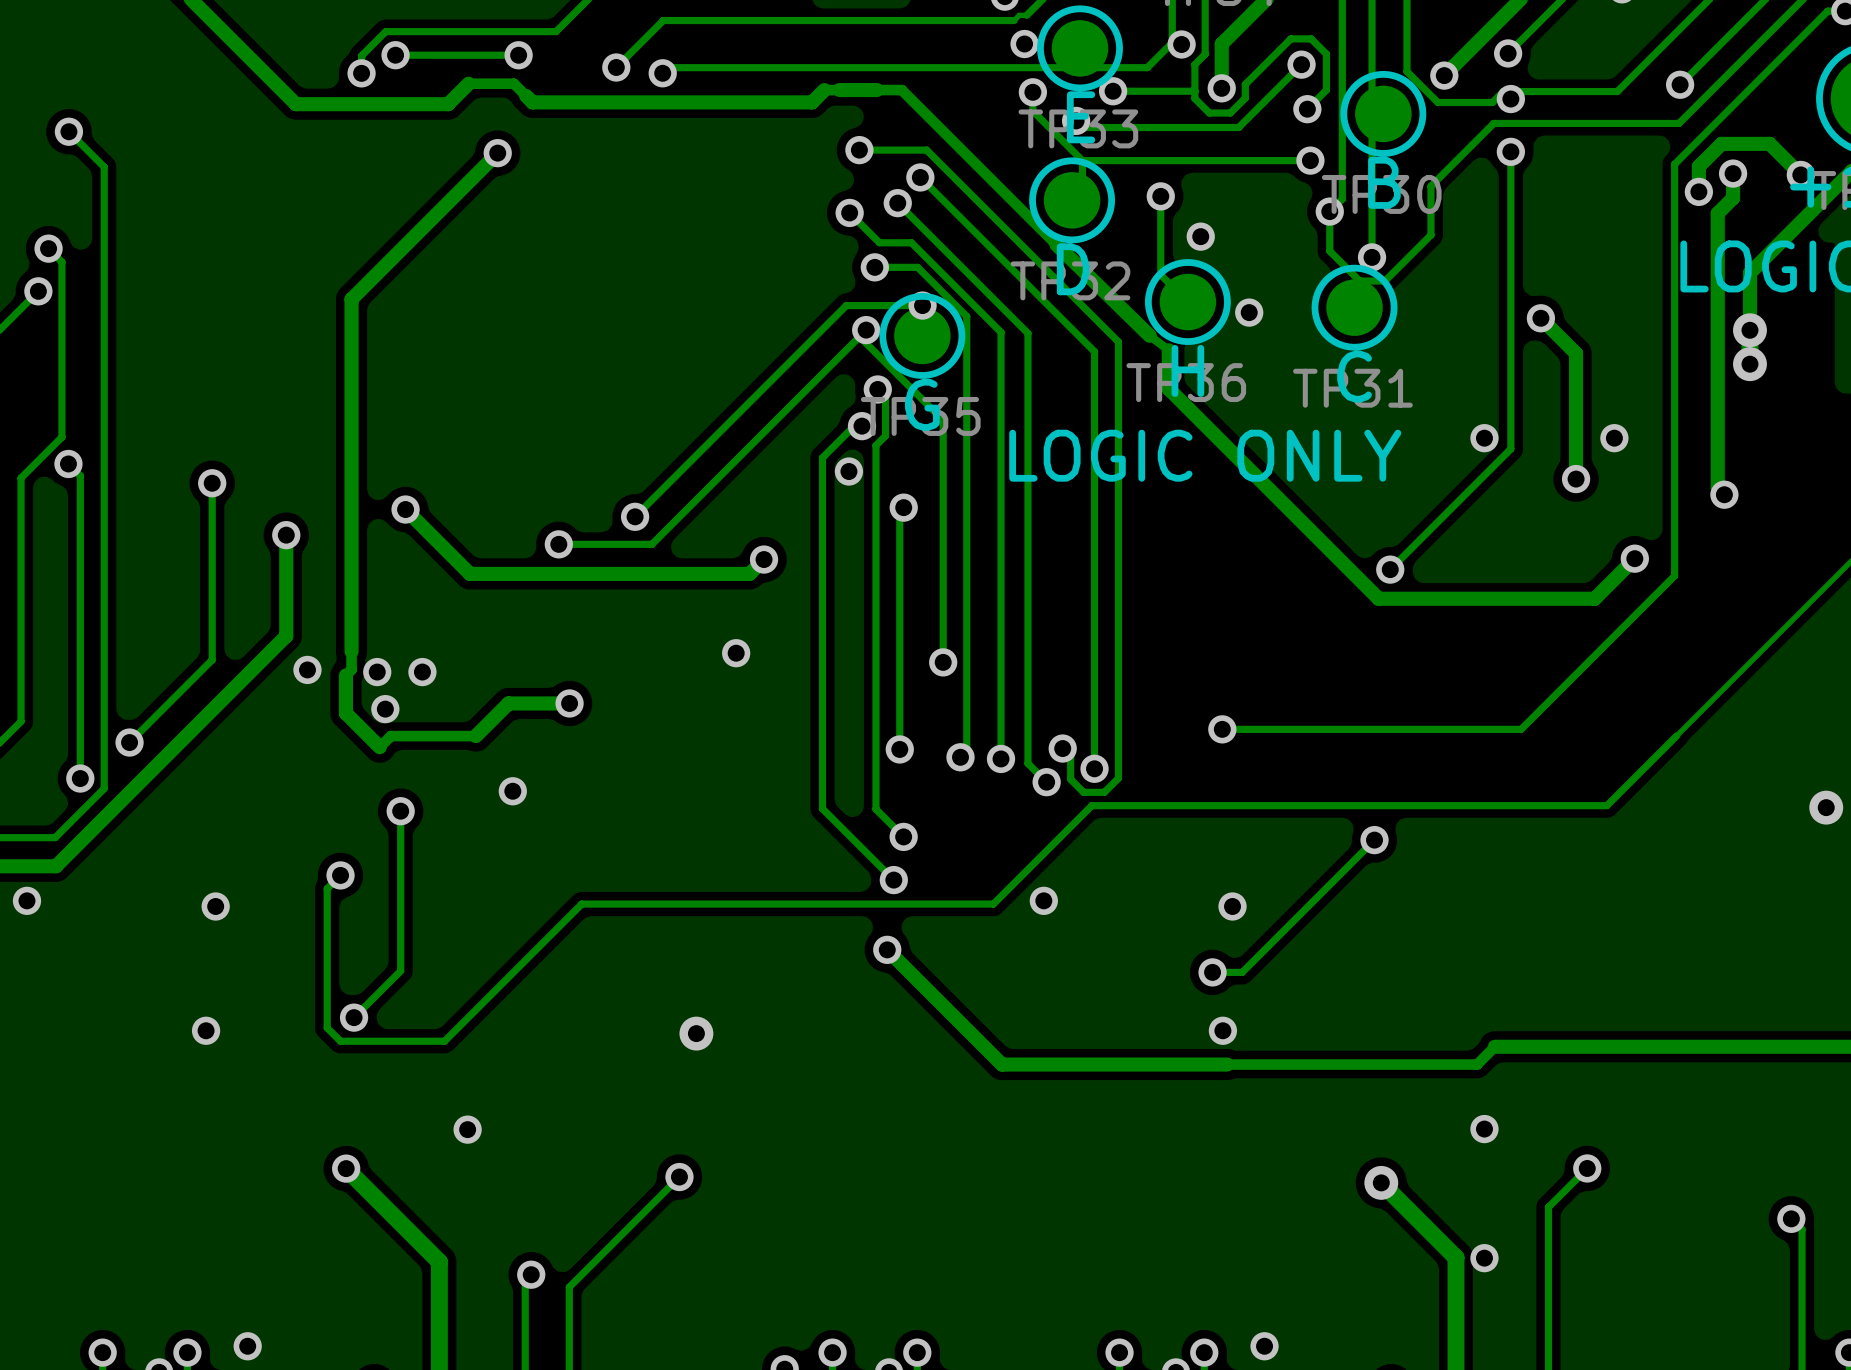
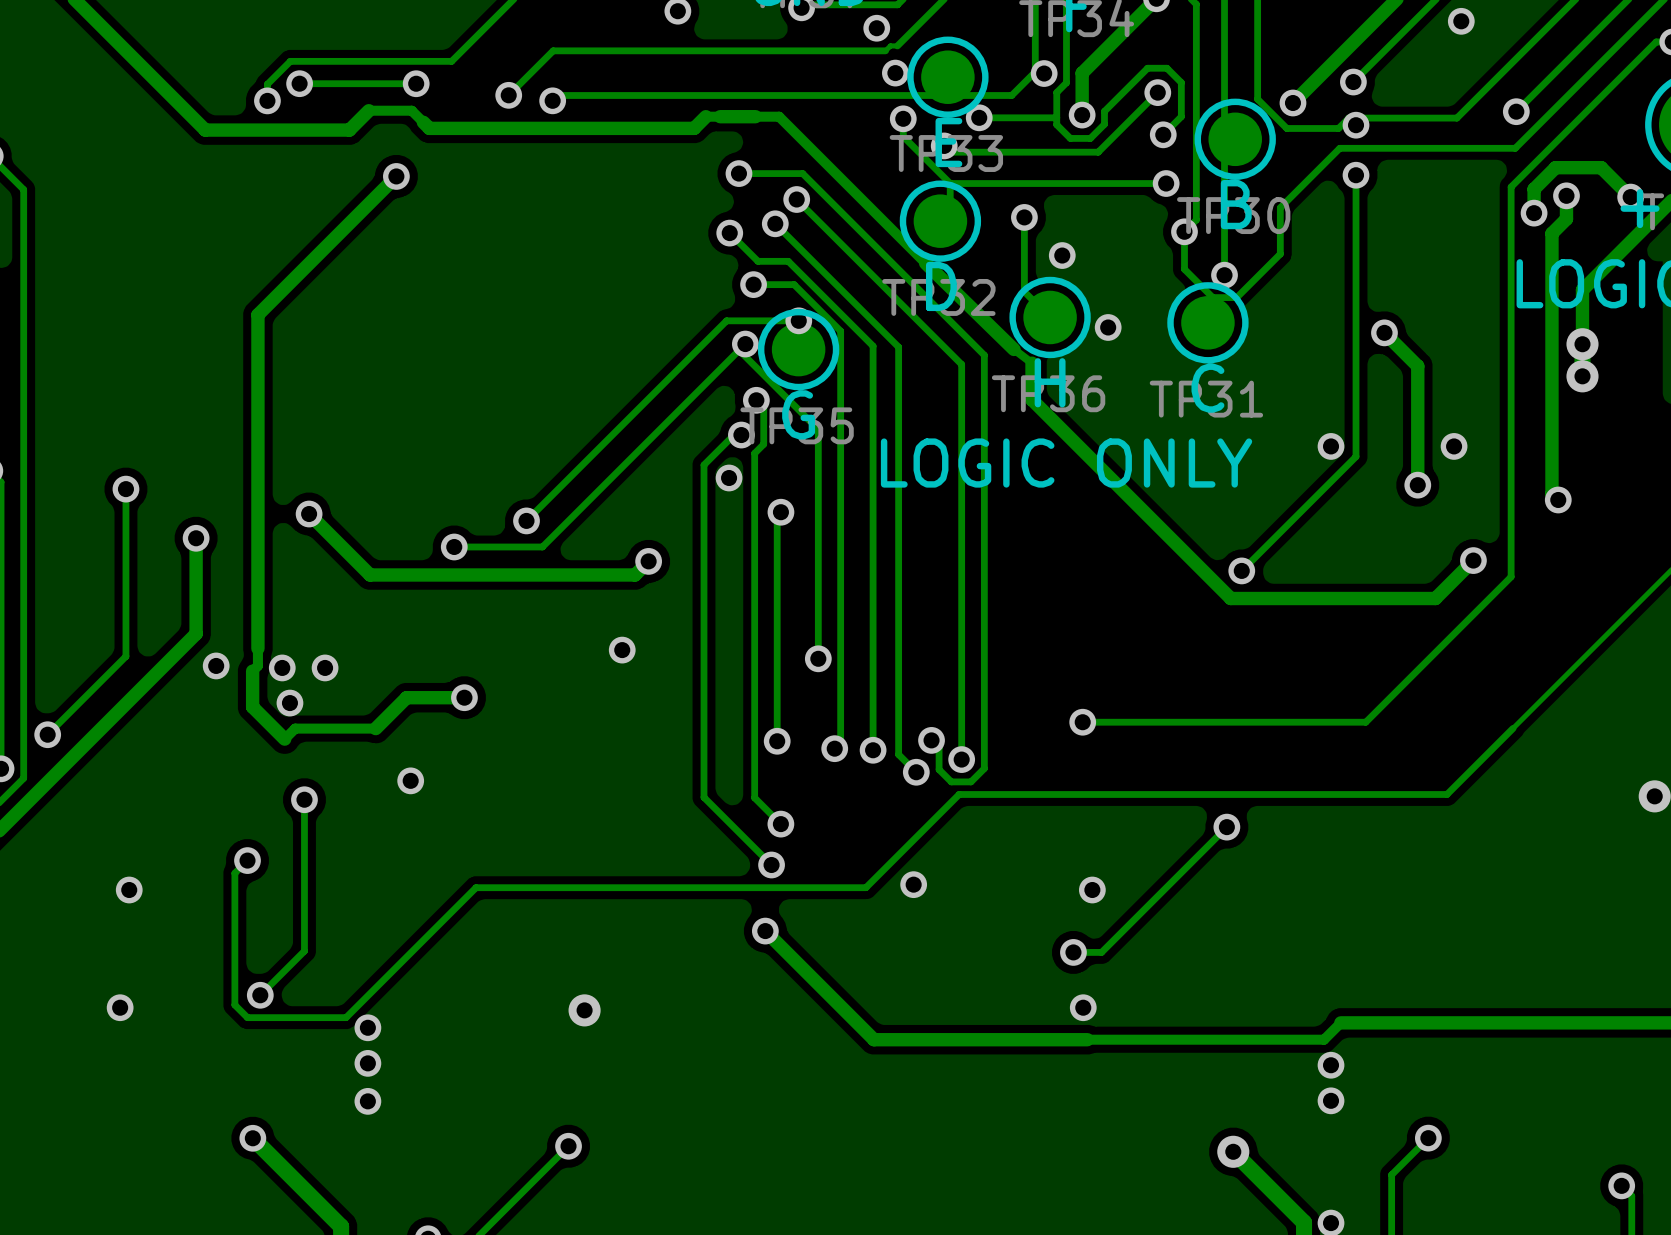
via: none -> (367, 1027)
via: none -> (367, 1063)
via: none -> (1331, 1065)

